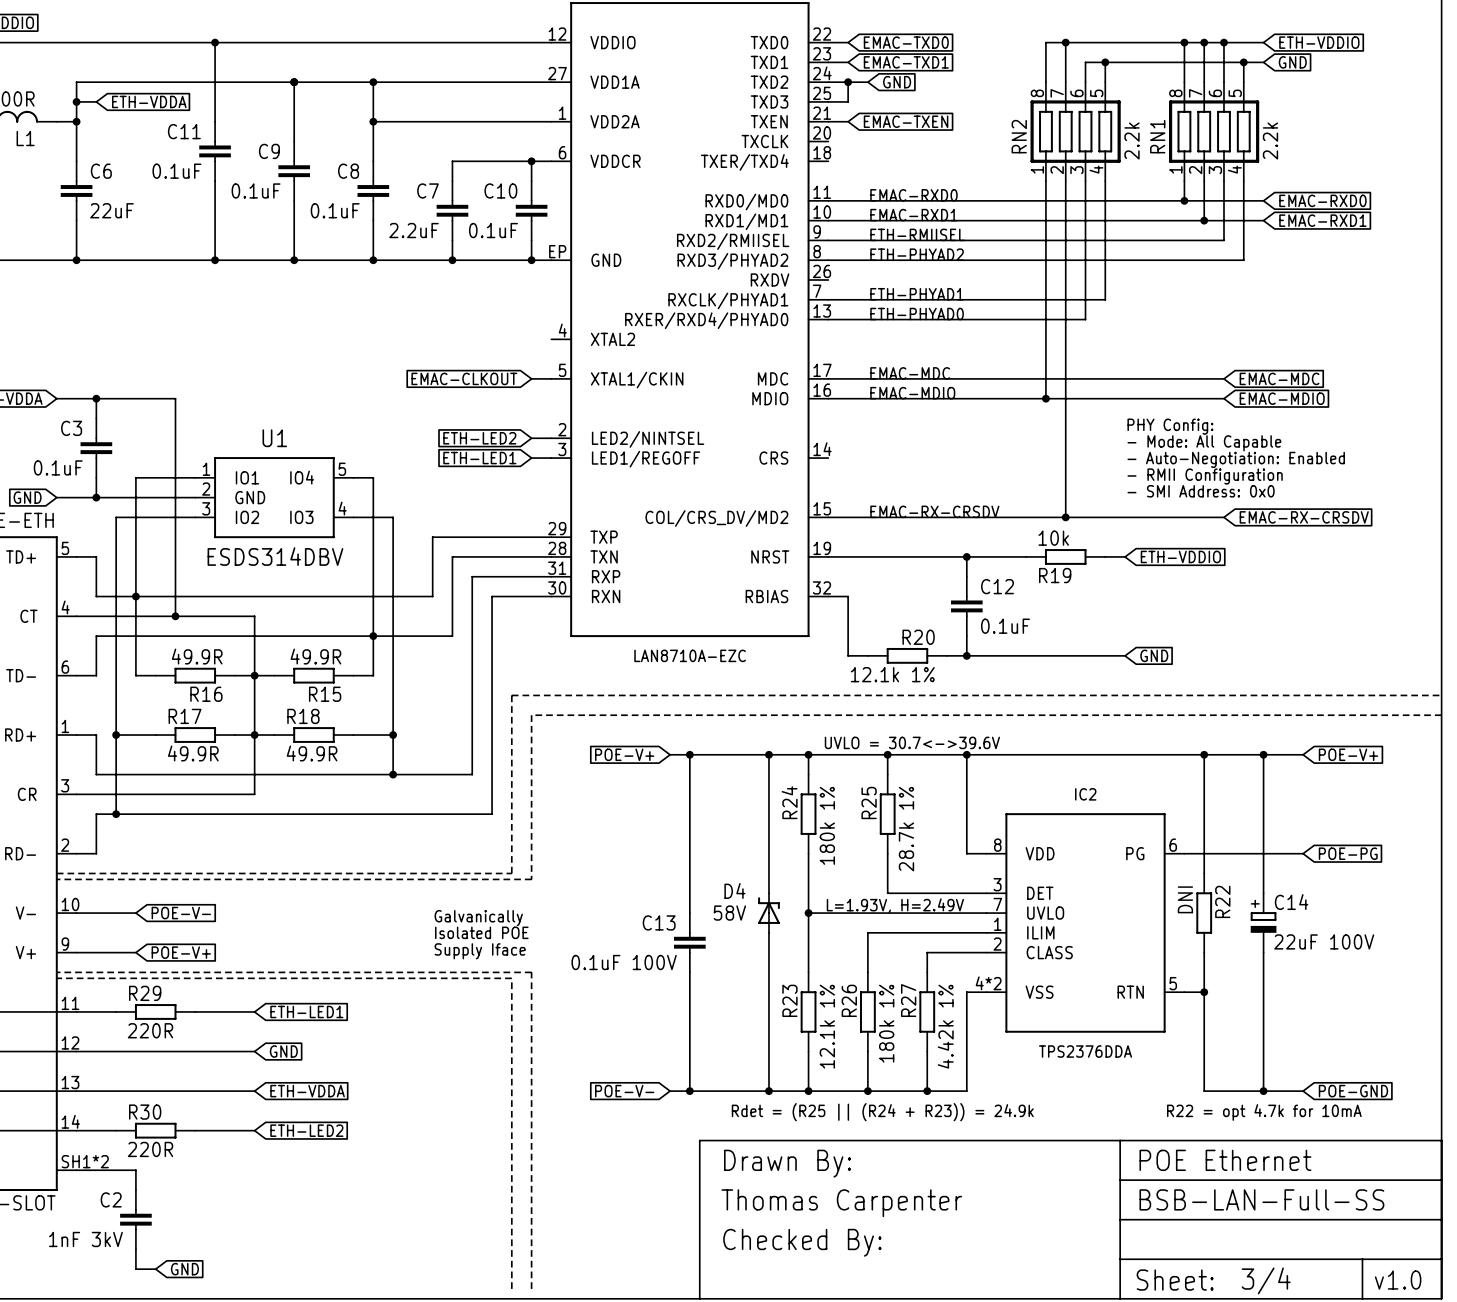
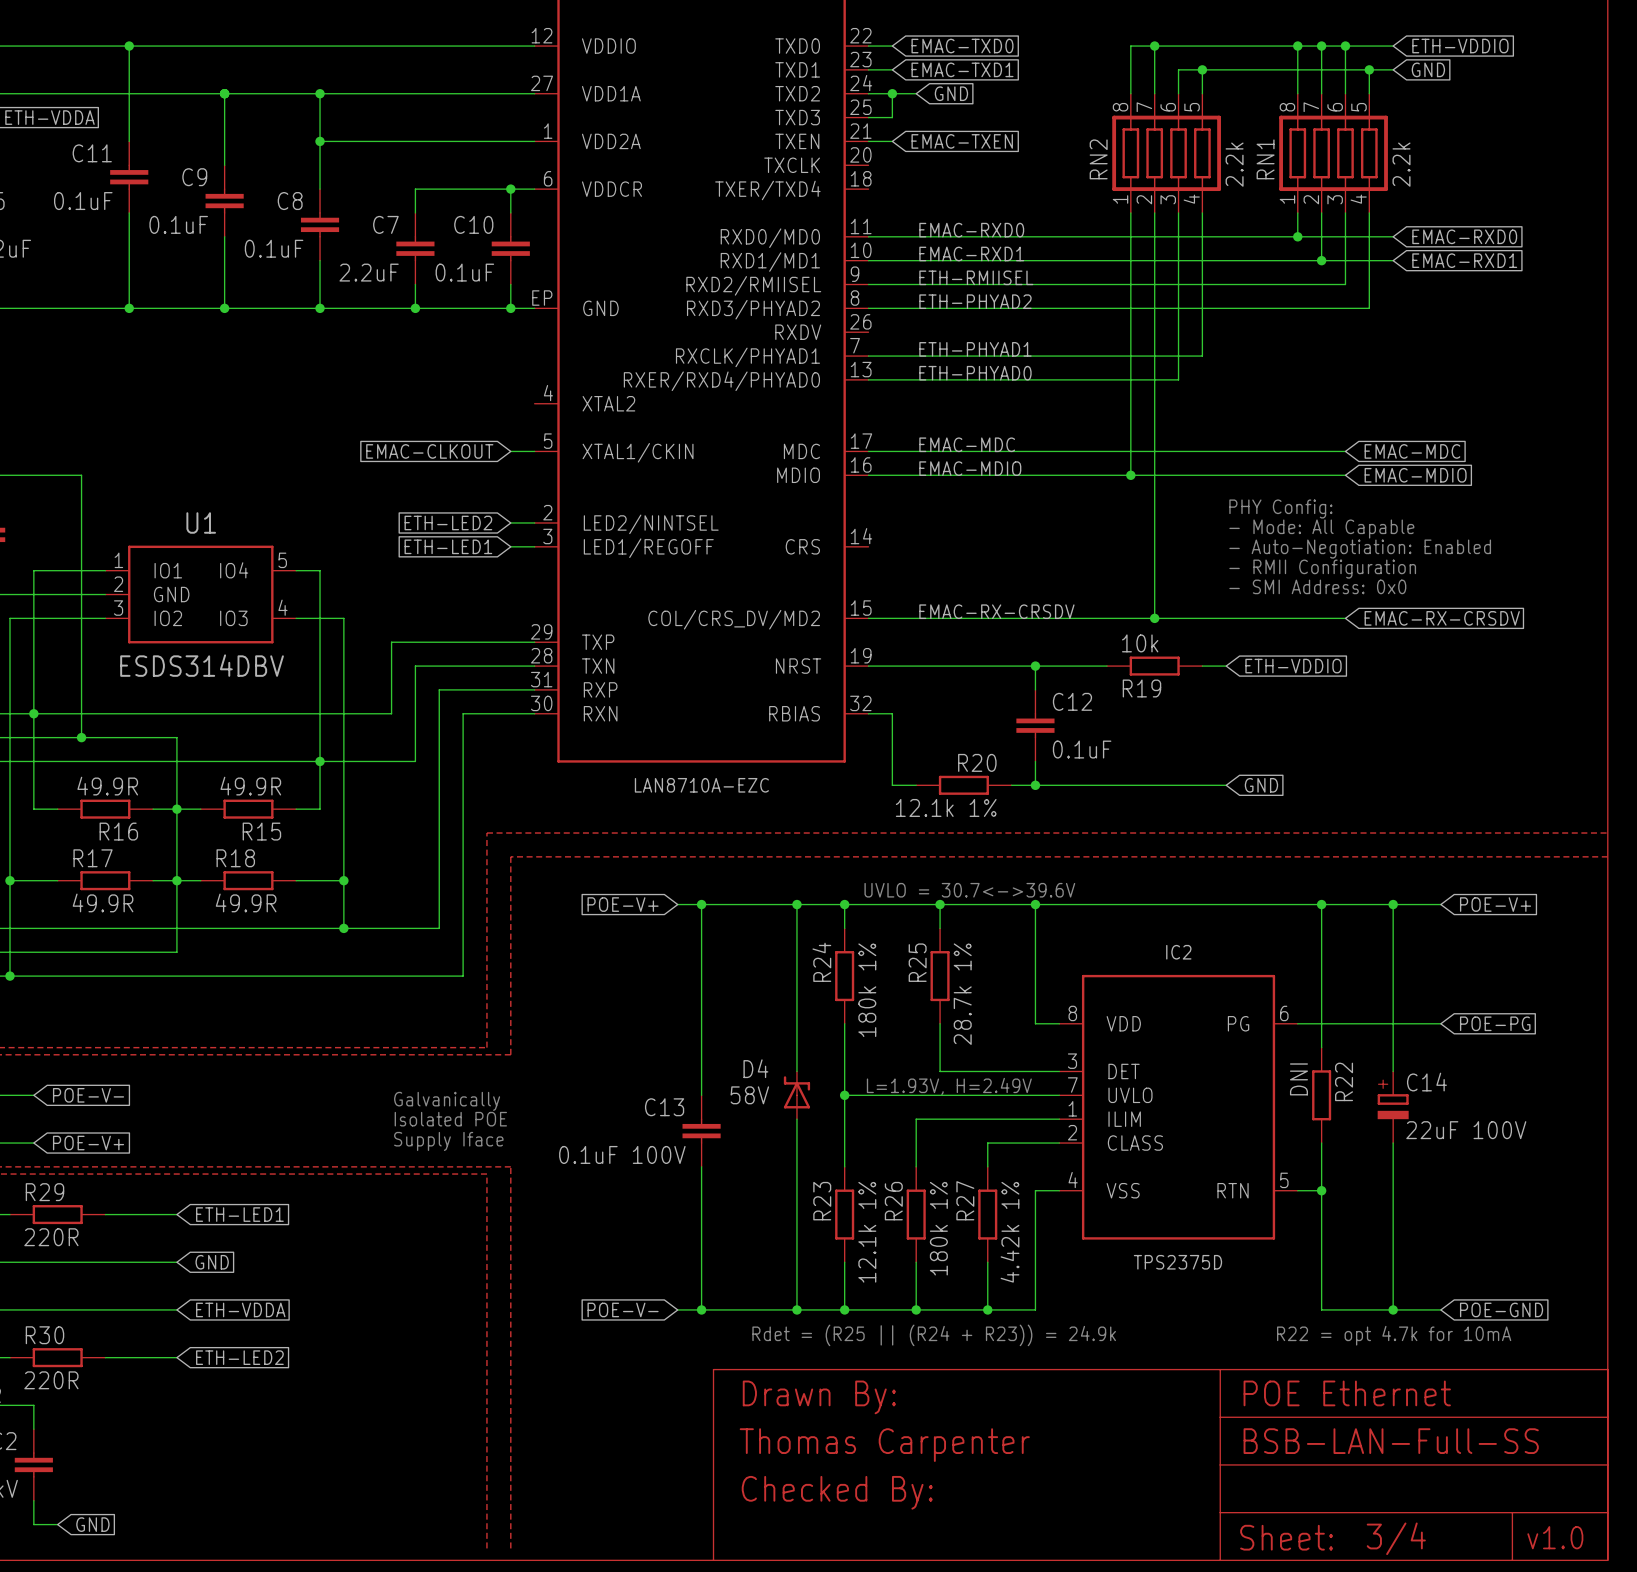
IC2 pin number: 4*2 (988, 983) -> 4 (1073, 1180)
IC2 value: TPS2376DDA (1085, 1051) -> TPS2375D (1177, 1262)

